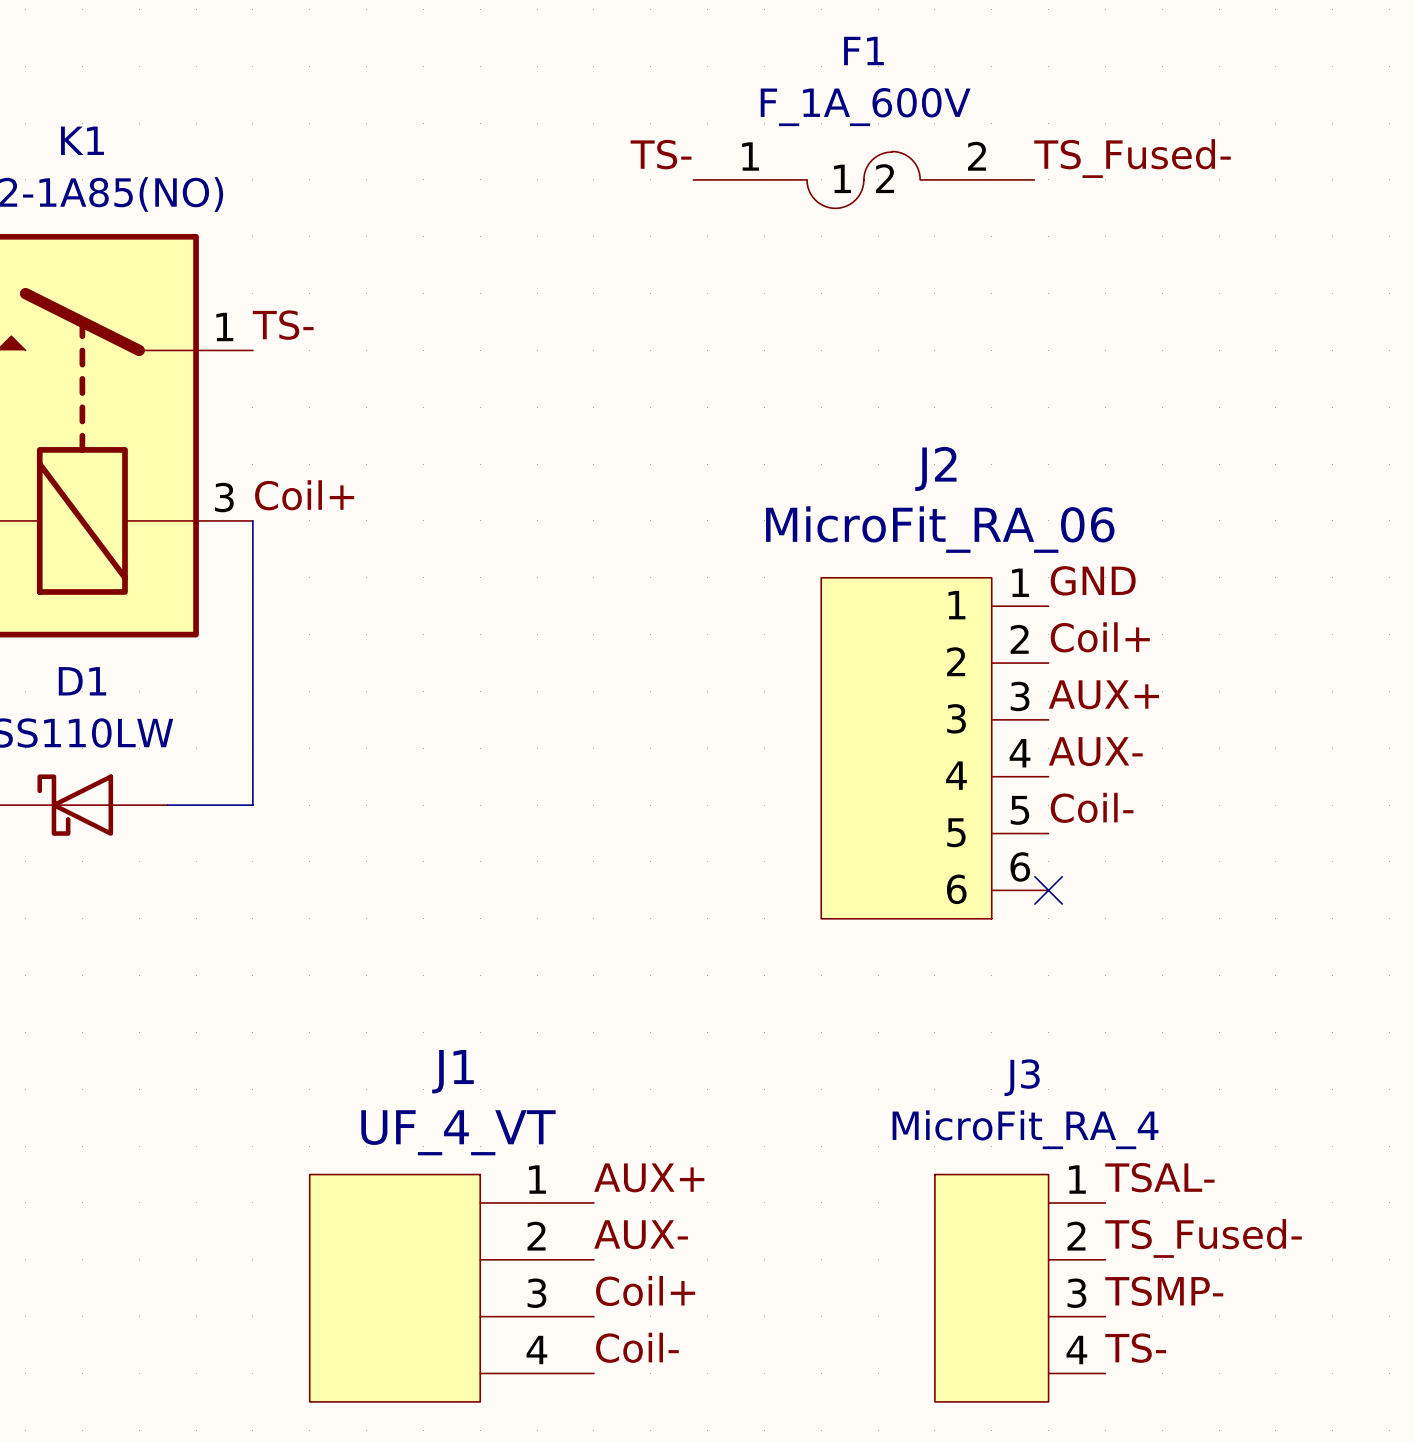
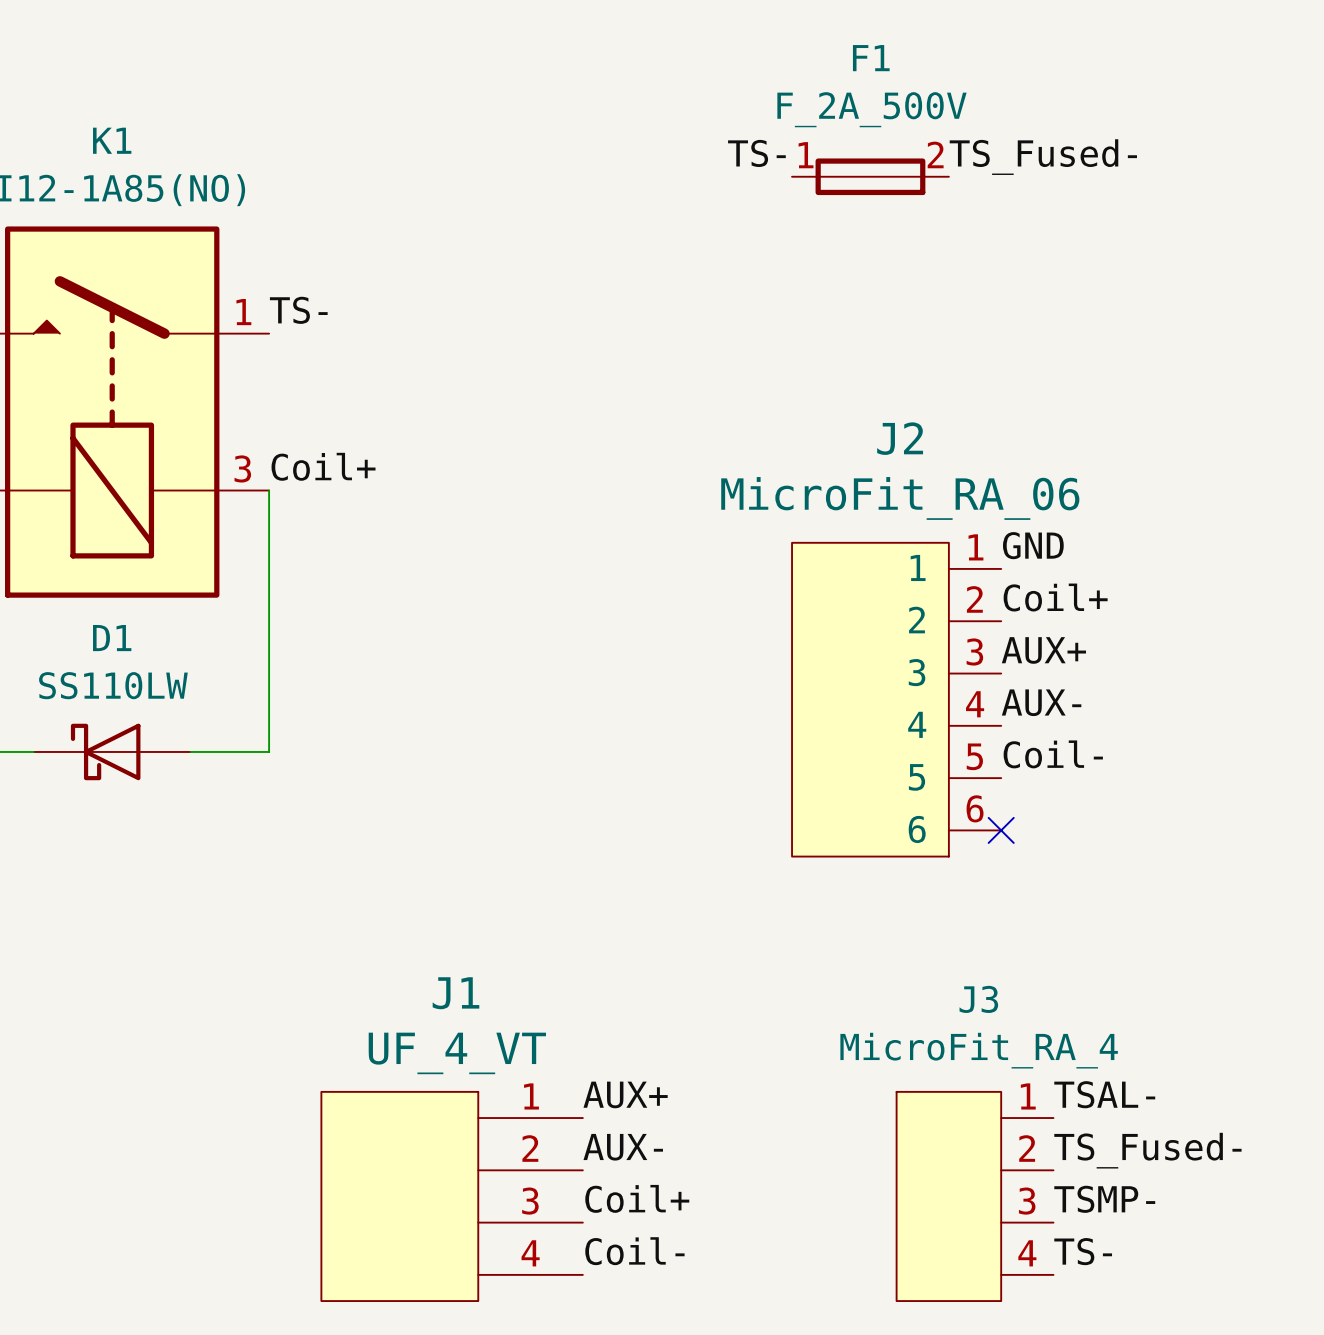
F1 value: F_1A_600V (865, 107) -> F_2A_500V (872, 109)
F1 symbol: [693, 151, 1035, 209] -> [792, 158, 949, 196]
label position: TS- (661, 154) -> TS- (756, 153)
label position: TS_Fused- (1132, 158) -> TS_Fused- (1043, 157)

